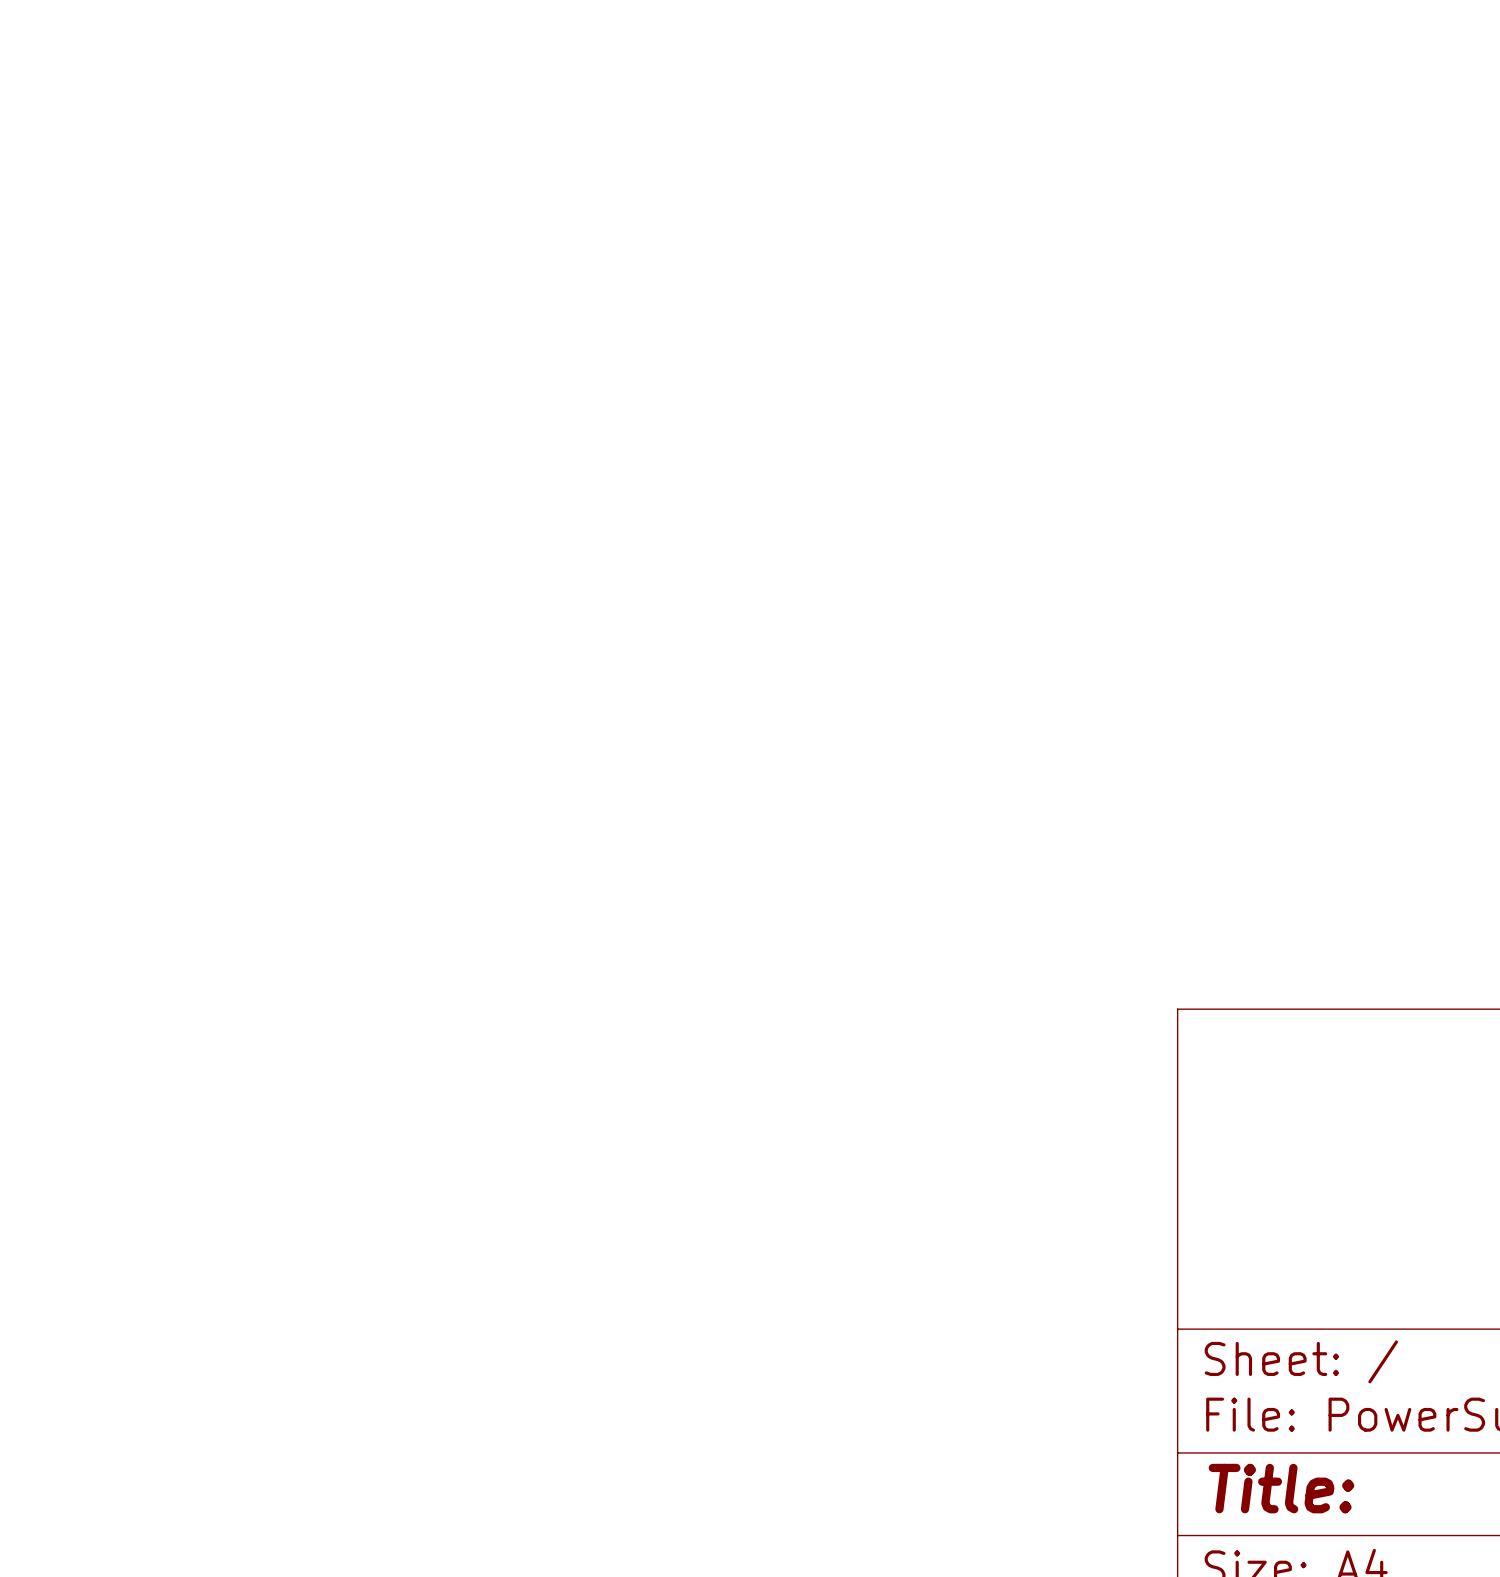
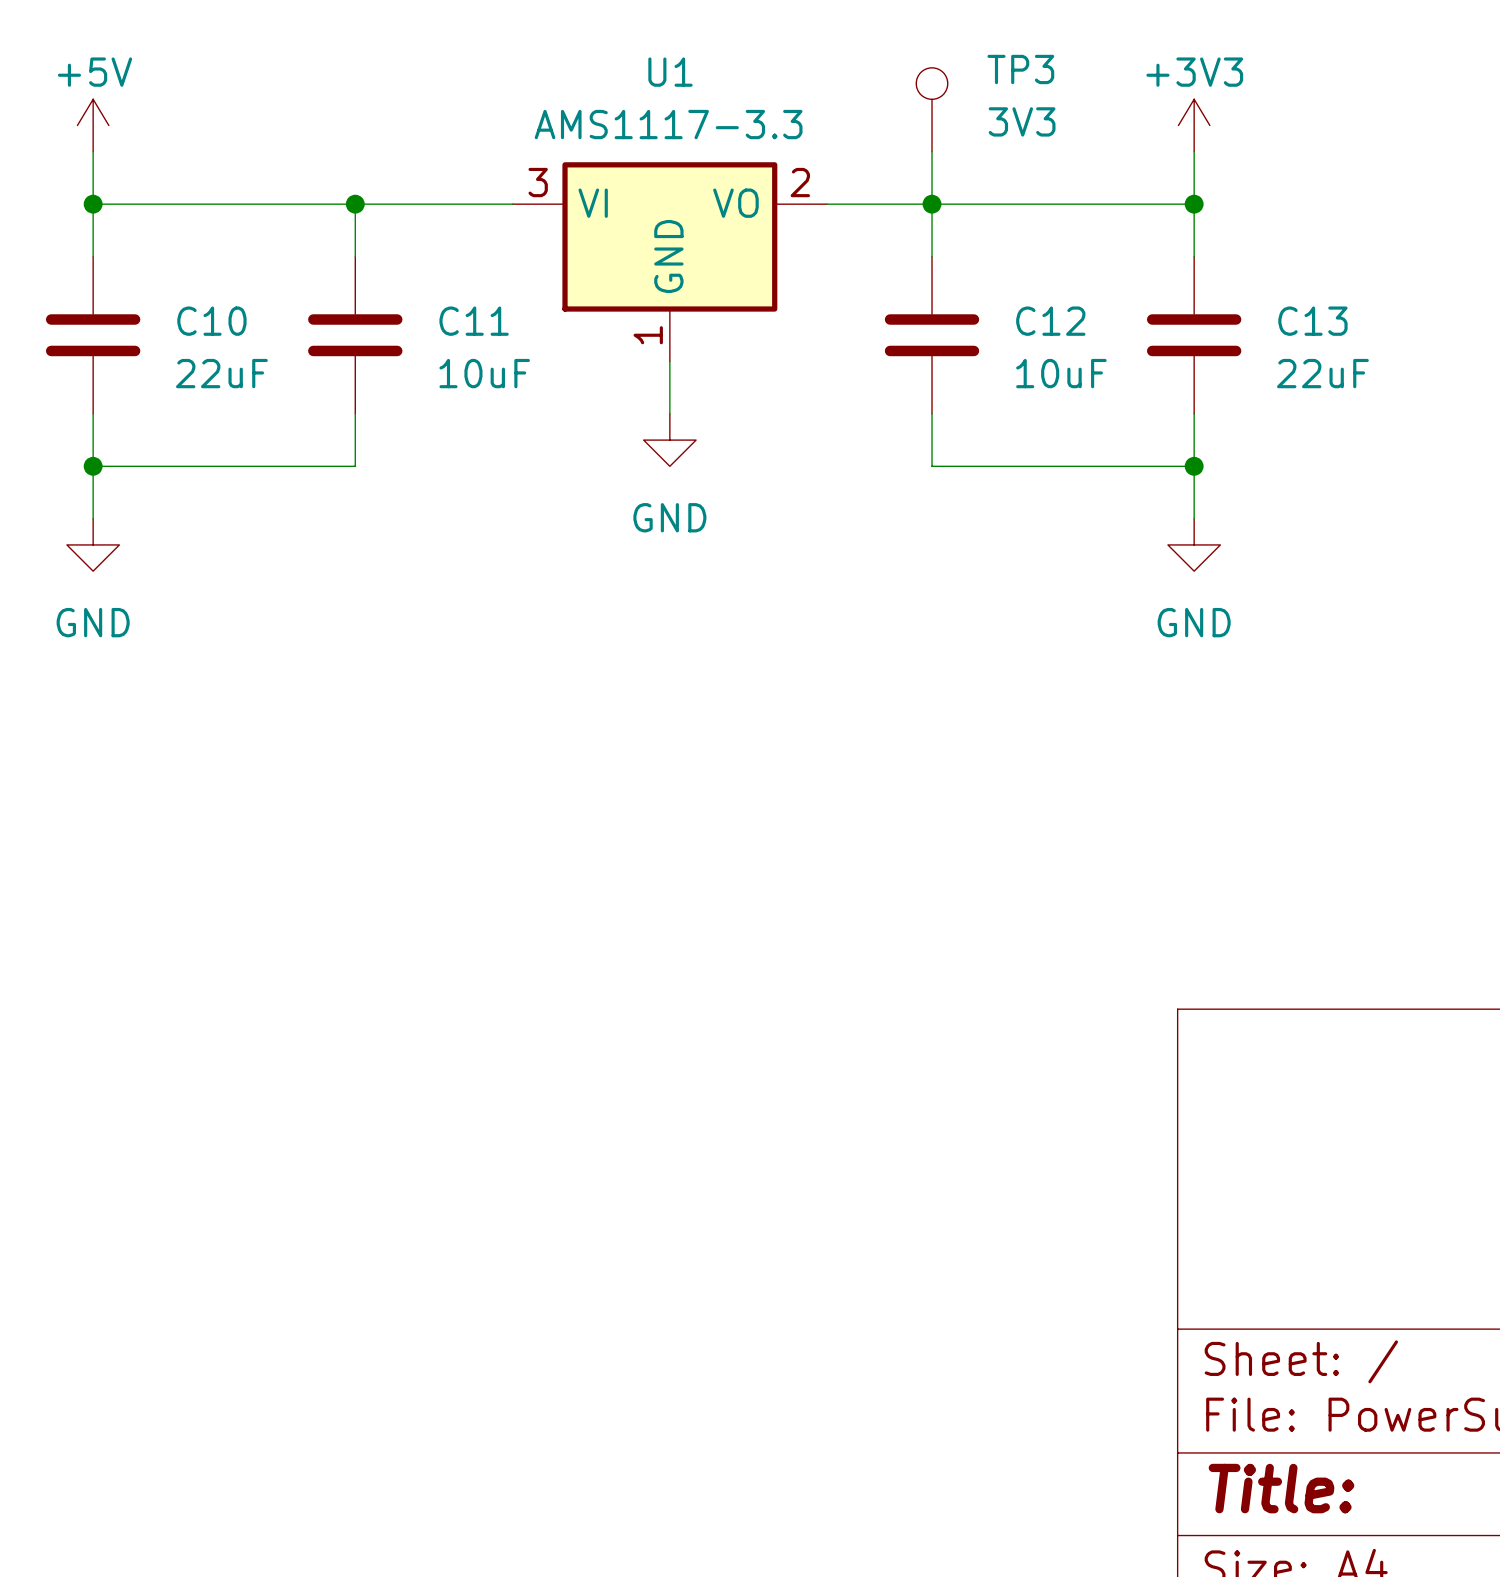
TP3: none -> 3V3 (932, 109)
power symbol: none -> +5V (93, 125)
power symbol: none -> +3V3 (1194, 125)
wire: none -> (93, 151) (93, 256)
wire: none -> (932, 151) (932, 256)
wire: none -> (1194, 151) (1194, 256)
wire: none -> (93, 204) (512, 204)
junction: none -> (93, 204)
wire: none -> (355, 204) (355, 256)
junction: none -> (355, 204)
wire: none -> (827, 204) (1194, 204)
junction: none -> (932, 204)
junction: none -> (1194, 204)
U1: none -> AMS1117-3.3 (669, 261)
C10: none -> 22uF (93, 335)
C11: none -> 10uF (355, 335)
C12: none -> 10uF (932, 335)
C13: none -> 22uF (1194, 335)
wire: none -> (669, 361) (669, 413)
wire: none -> (93, 413) (93, 518)
wire: none -> (355, 413) (355, 466) (93, 466)
wire: none -> (932, 413) (932, 466) (1194, 466)
wire: none -> (1194, 413) (1194, 518)
power symbol: none -> GND (669, 440)
junction: none -> (93, 466)
junction: none -> (1194, 466)
power symbol: none -> GND (93, 544)
power symbol: none -> GND (1194, 544)

